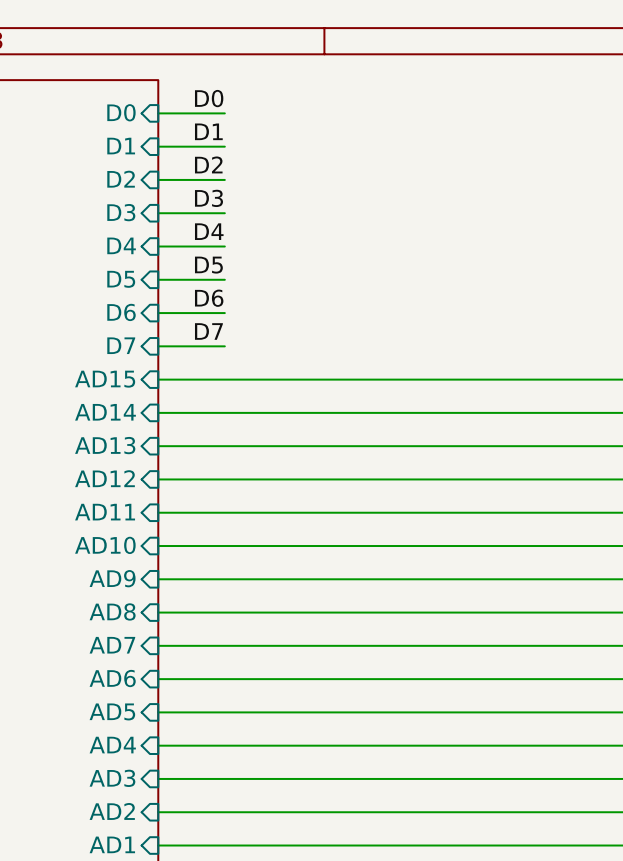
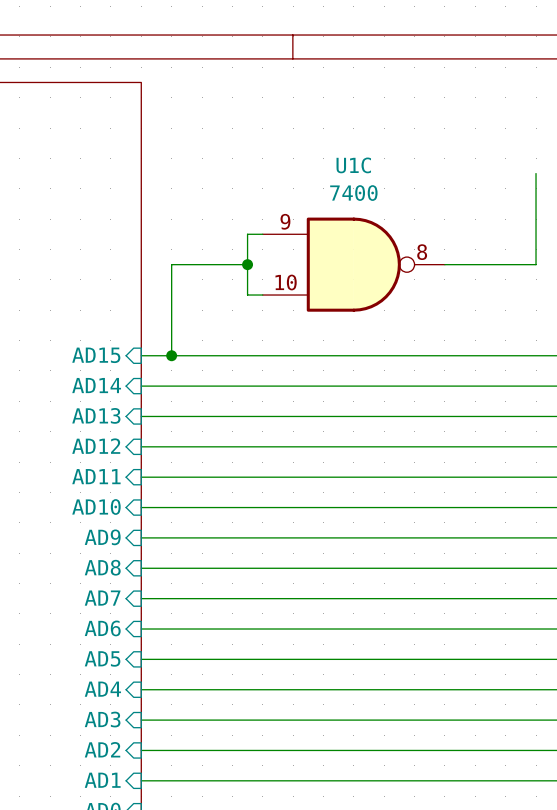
label: D0 (209, 98) -> none
sheet pin: D0 (121, 112) -> none
wire: (158, 113) (224, 113) -> none
label: D1 (208, 131) -> none
sheet pin: D1 (121, 146) -> none
wire: (158, 146) (224, 146) -> none
label: D2 (208, 164) -> none
sheet pin: D2 (121, 179) -> none
wire: (158, 179) (224, 179) -> none
wire: none -> (536, 173) (536, 264) (444, 264)
label: D3 (208, 198) -> none
sheet pin: D3 (121, 212) -> none
wire: (158, 213) (224, 213) -> none
label: D4 (209, 231) -> none
sheet pin: D4 (121, 245) -> none
wire: (158, 246) (224, 246) -> none
wire: none -> (262, 234) (247, 234) (247, 295) (262, 295)
label: D5 (208, 265) -> none
sheet pin: D5 (121, 279) -> none
wire: (158, 279) (191, 279) -> (171, 355) (171, 264)
wire: none -> (202, 264) (247, 264)
junction: none -> (247, 264)
U1C: none -> 7400 (353, 264)
label: D6 (209, 298) -> none
sheet pin: D6 (121, 312) -> none
wire: (158, 313) (224, 313) -> none
label: D7 (208, 331) -> none
sheet pin: D7 (121, 345) -> none
wire: (158, 346) (224, 346) -> none
junction: none -> (171, 355)

